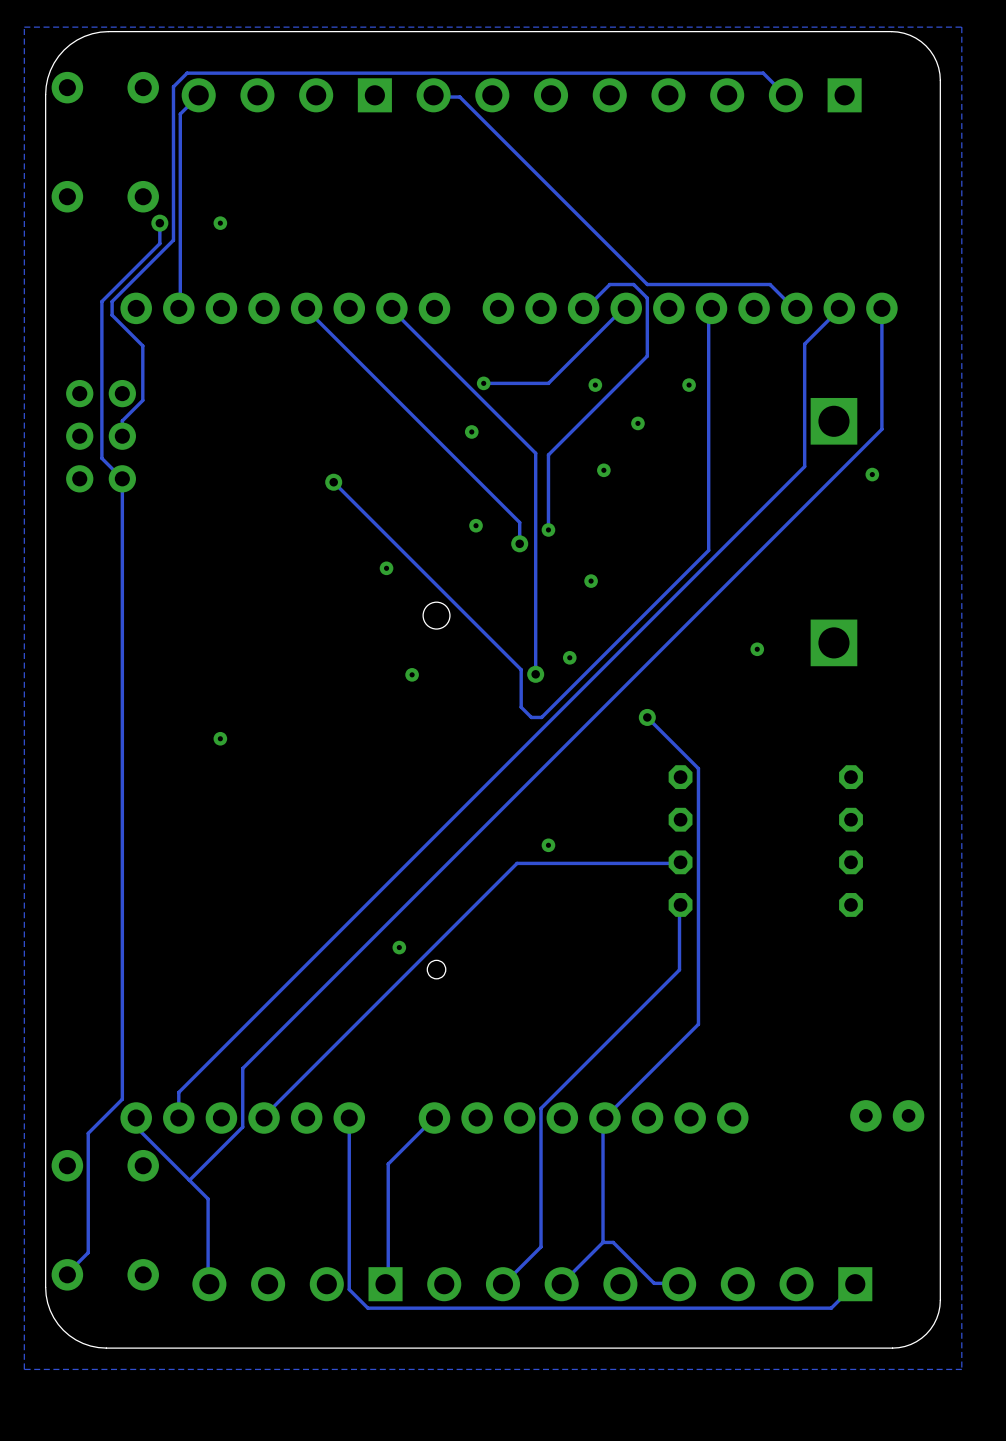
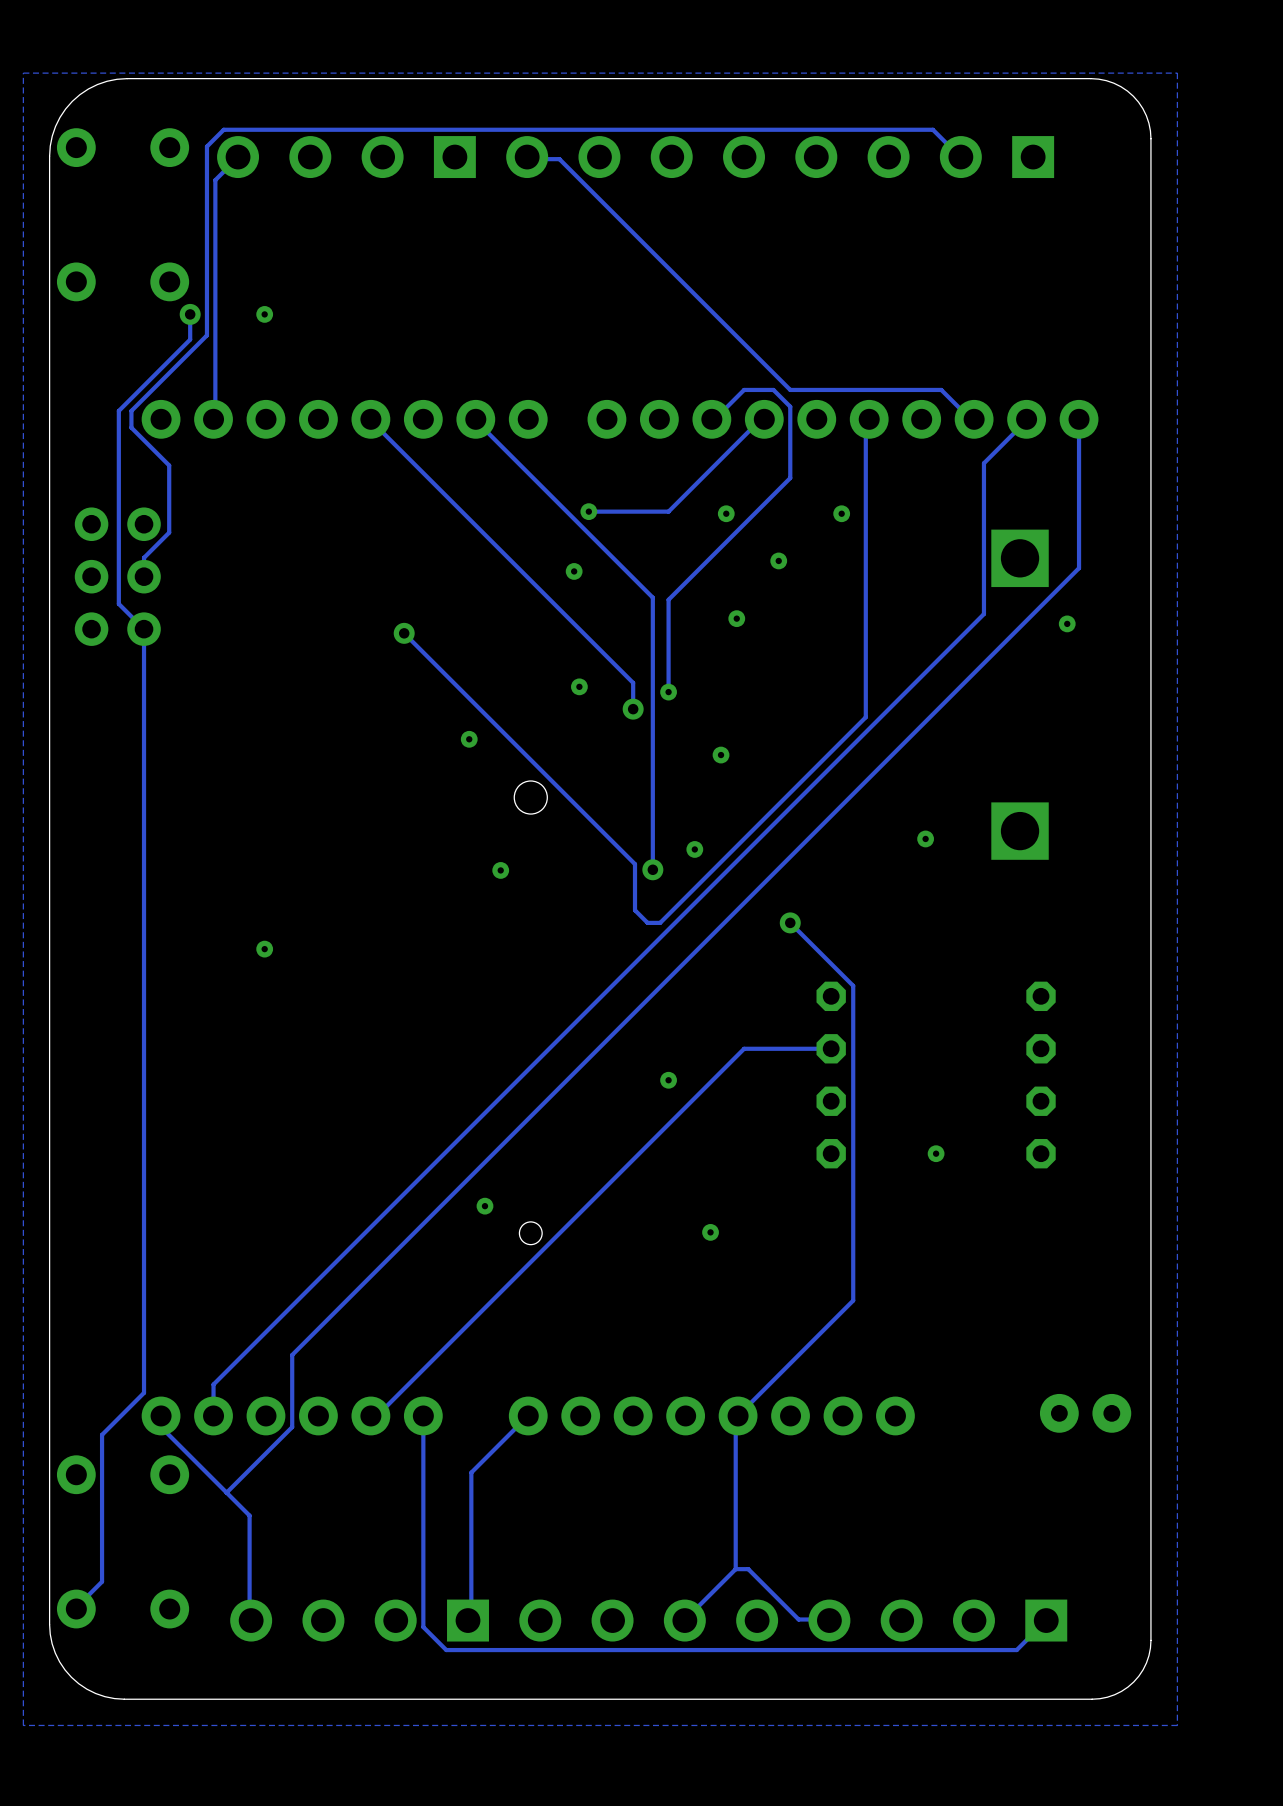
track: none -> (831, 1048) (744, 1048) (374, 1418) (370, 1415)
track: (679, 863) (517, 863) (264, 1118) -> none
via: none -> (936, 1153)
track: (679, 906) (679, 969) (541, 1108) (541, 1246) (502, 1284) -> none
via: none -> (710, 1232)

